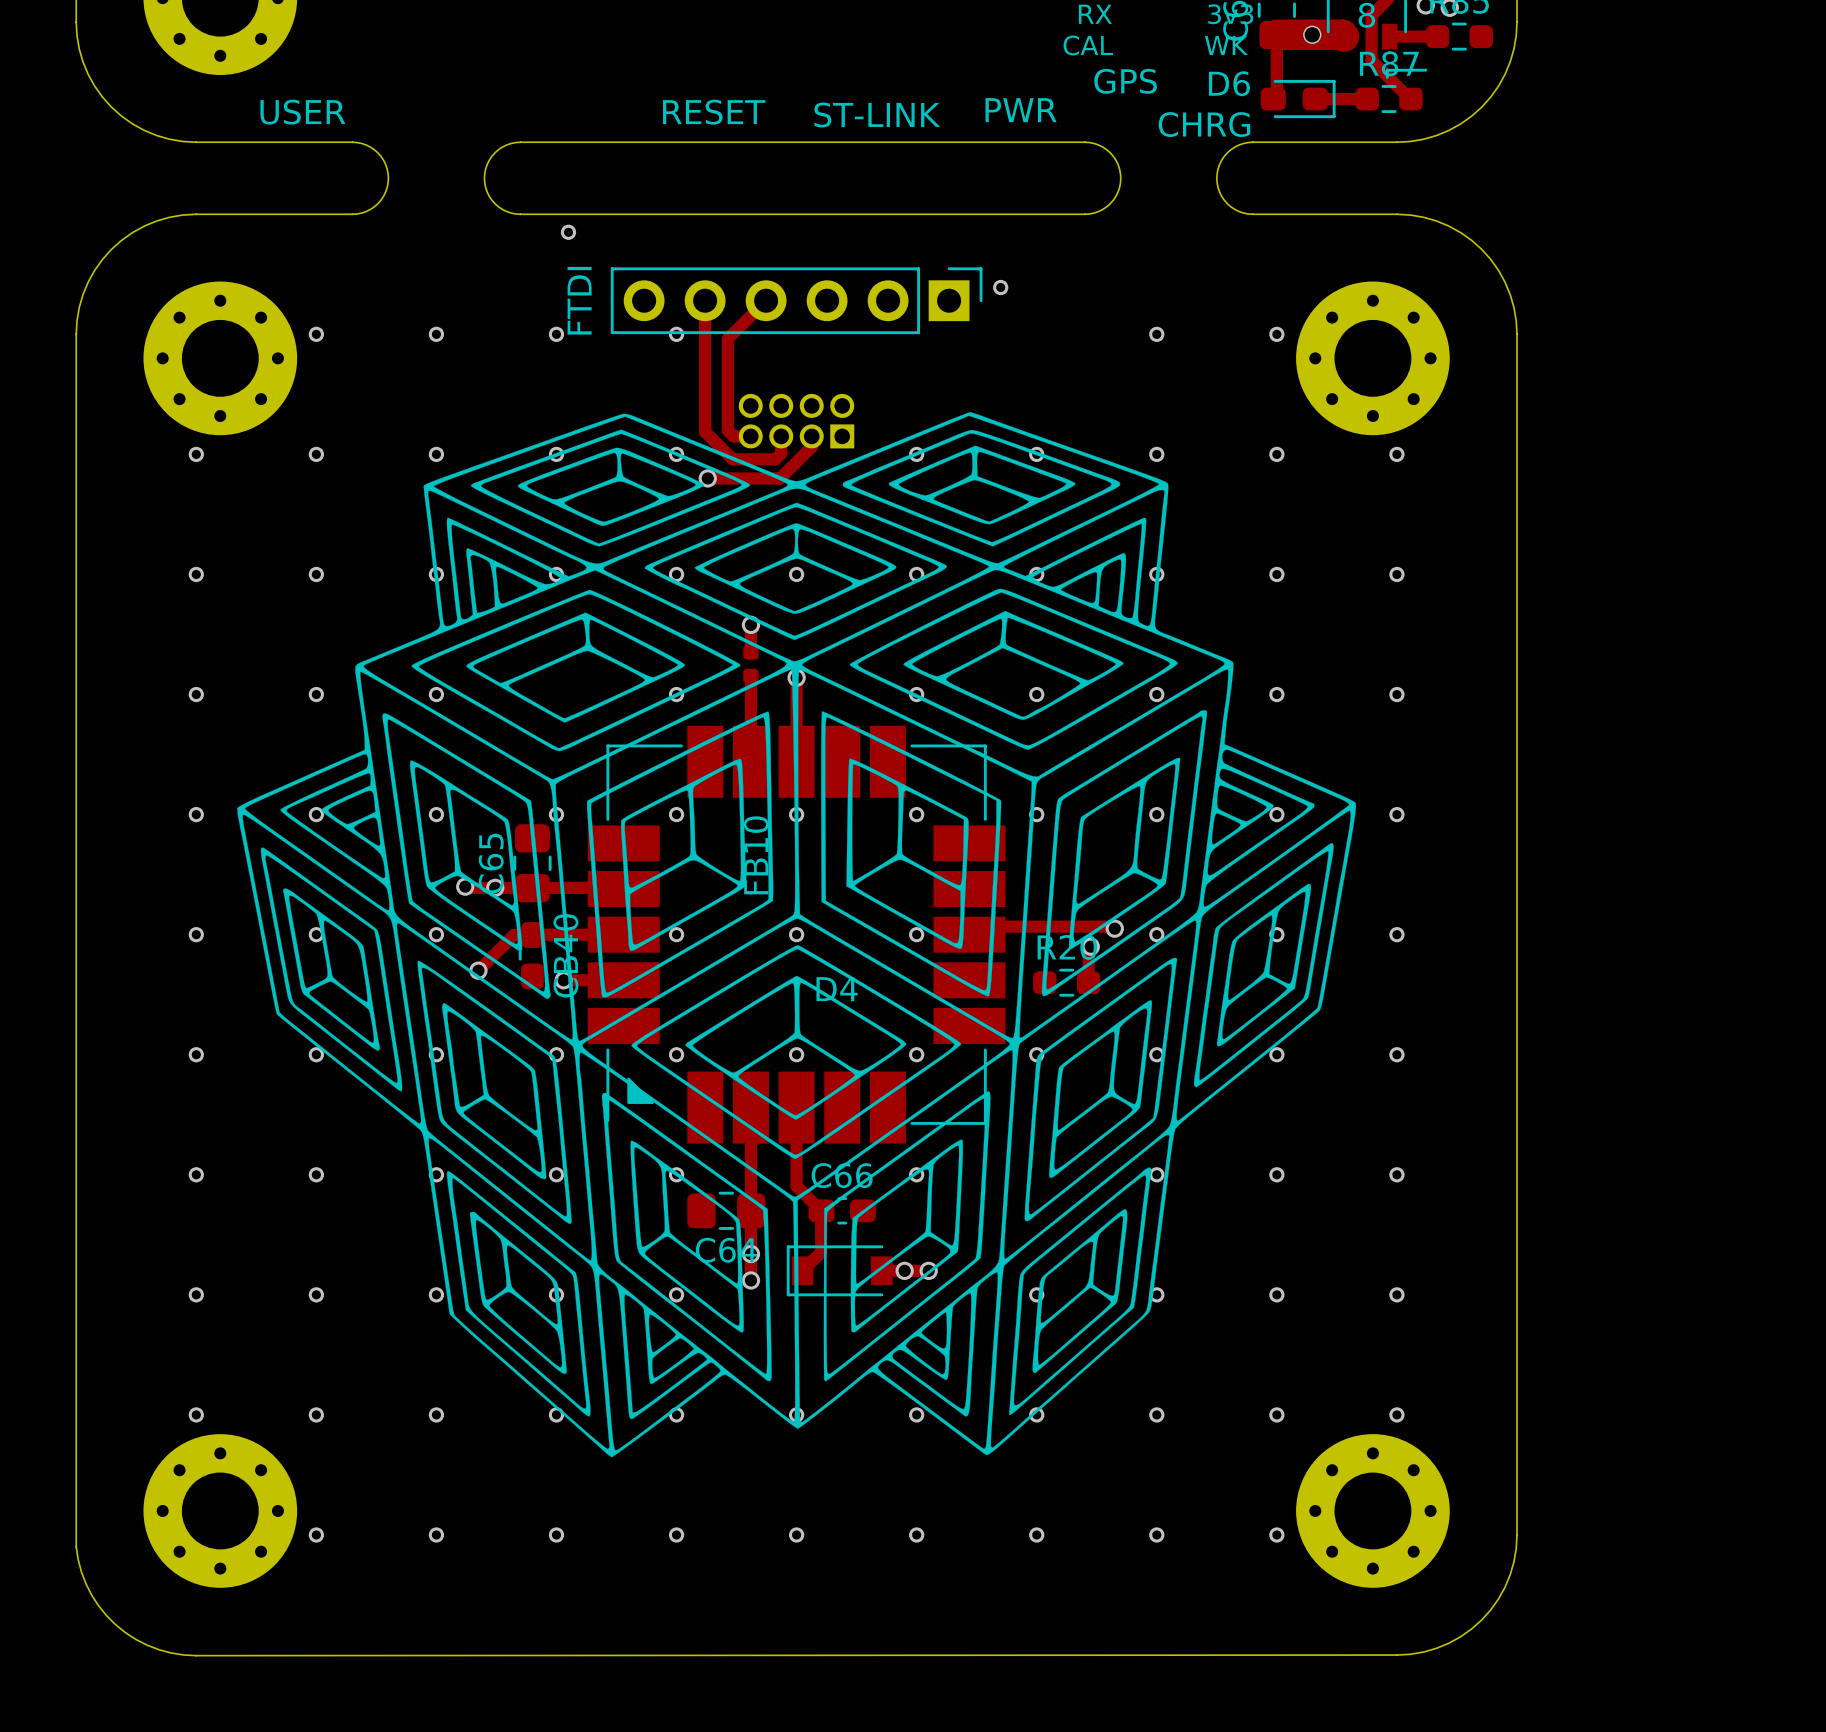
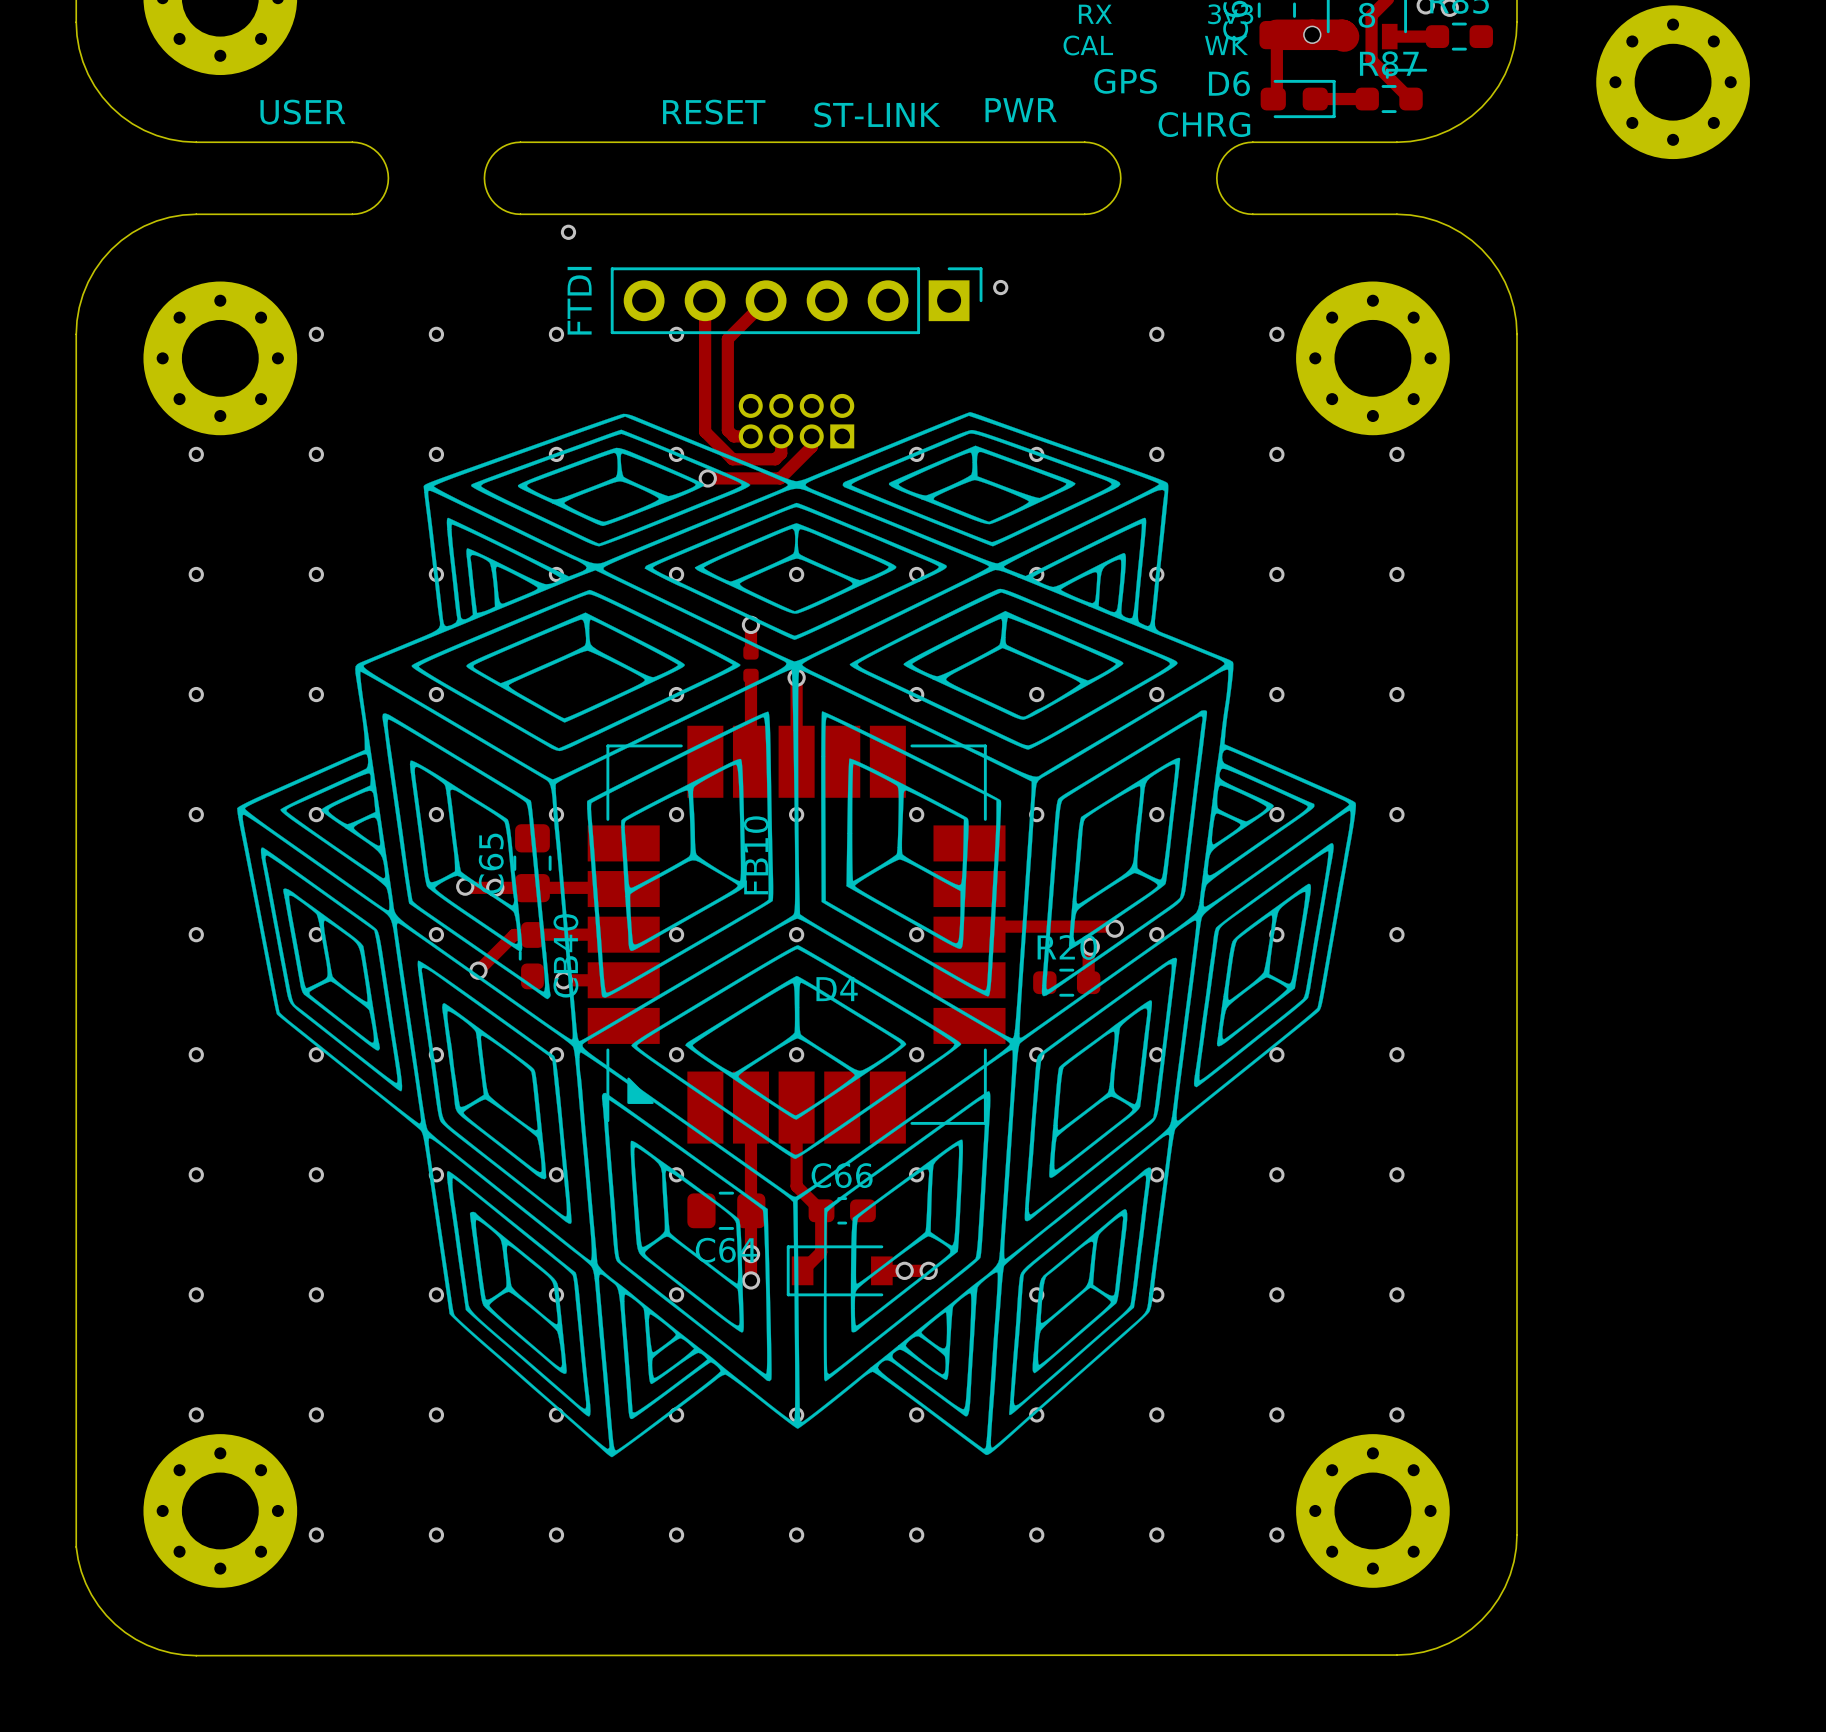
part: none -> (1673, 82)

